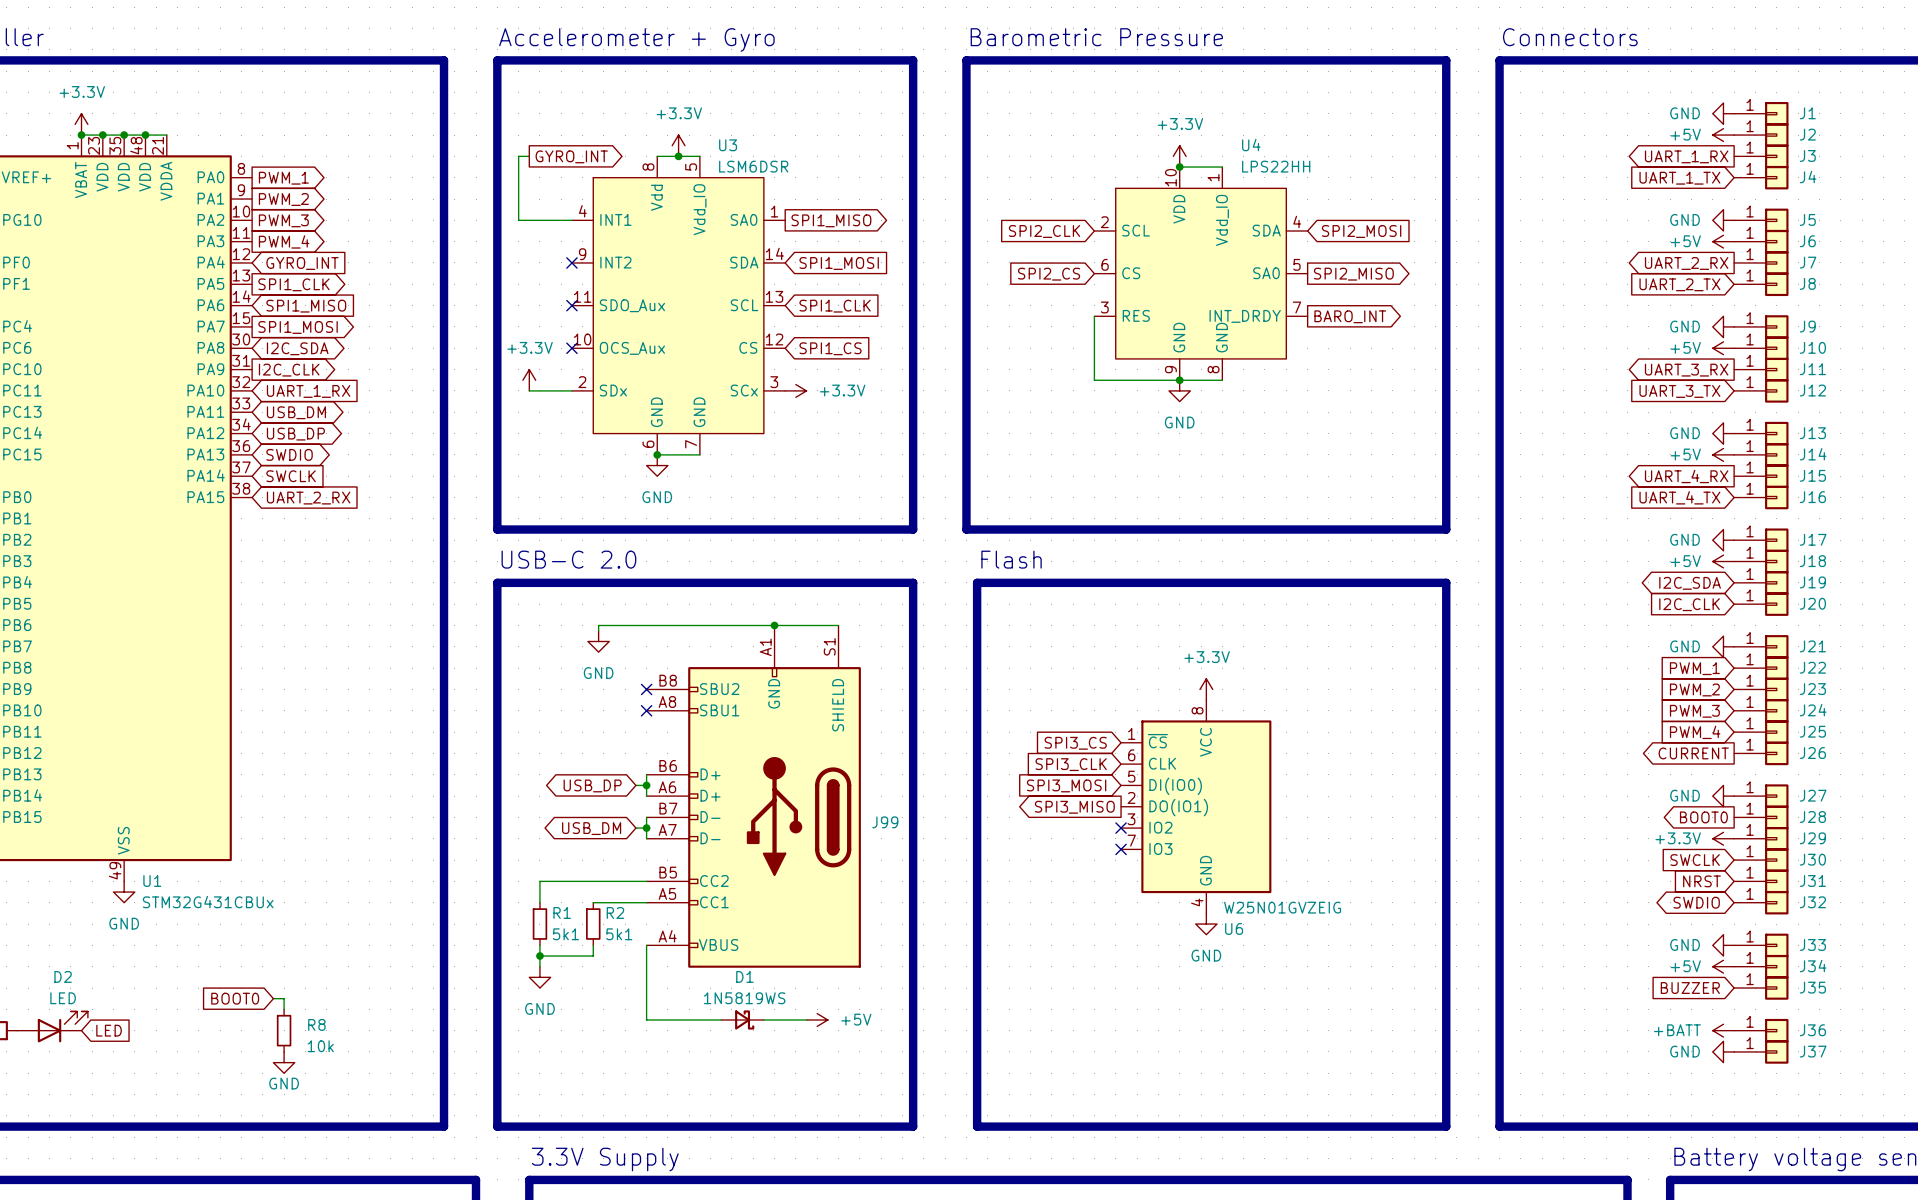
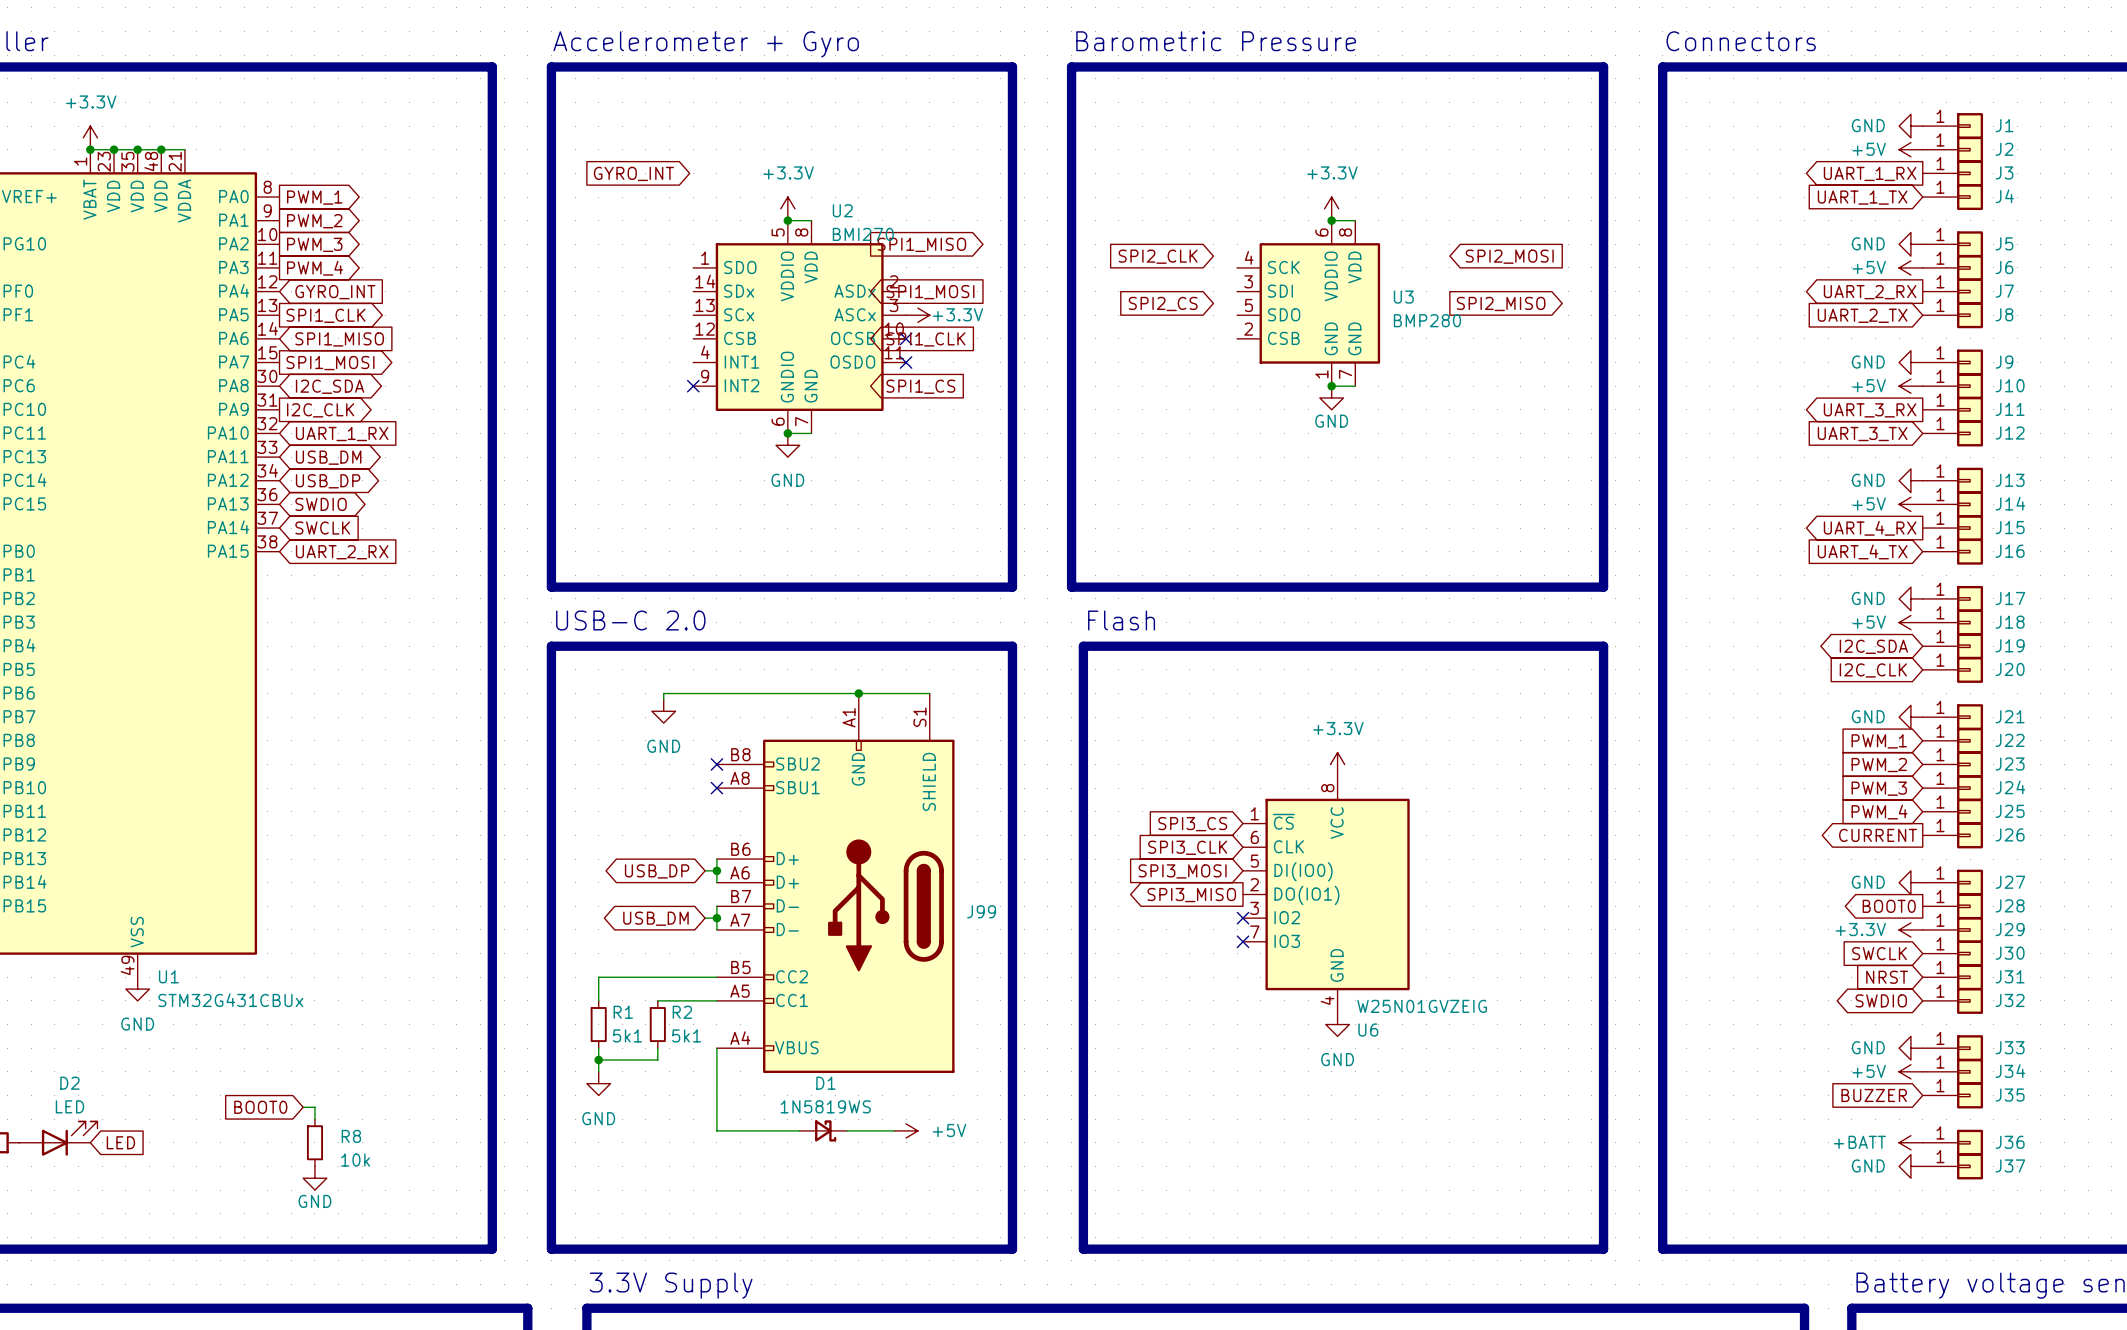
power symbol position: +3.3V (678, 145) -> +3.3V (787, 208)
U3 name position: U3 (728, 145) -> U3 (1403, 297)
wire: (529, 156) (518, 156) (518, 220) (571, 220) -> none
U3 symbol: [571, 156, 786, 455] -> [1237, 220, 1381, 387]
wire: (657, 156) (699, 156) -> none
junction: (678, 156) -> none
power symbol position: +3.3V (1179, 156) -> +3.3V (1331, 208)
U3 value: LSM6DSR (753, 166) -> BMP280 (1427, 320)
wire: (1179, 167) (1222, 167) -> none
junction position: (1179, 167) -> (1331, 220)
junction: none -> (787, 220)
no-connect mark: (571, 262) -> none
U4: LPS22HH (1201, 273) -> none
power symbol: none -> +3.3V (917, 315)
U2: none -> BMI270 (799, 327)
no-connect mark: (571, 305) -> none
no-connect mark: none -> (906, 338)
wire: (1094, 316) (1094, 380) (1222, 380) -> none
global label: BARO_INT (1350, 316) -> none
no-connect mark: none -> (906, 362)
no-connect mark: (571, 348) -> none
no-connect mark: none -> (693, 386)
power symbol: +3.3V (529, 380) -> none
junction position: (1179, 380) -> (1331, 386)
wire: (529, 390) (571, 390) -> none
junction: none -> (787, 433)
power symbol: +3.3V (795, 390) -> none
power symbol position: GND (1179, 390) -> GND (1331, 397)
power symbol text position: GND (1179, 422) -> GND (1331, 421)
wire: (657, 454) (699, 454) -> none
junction: (657, 454) -> none
power symbol position: GND (657, 465) -> GND (787, 445)

